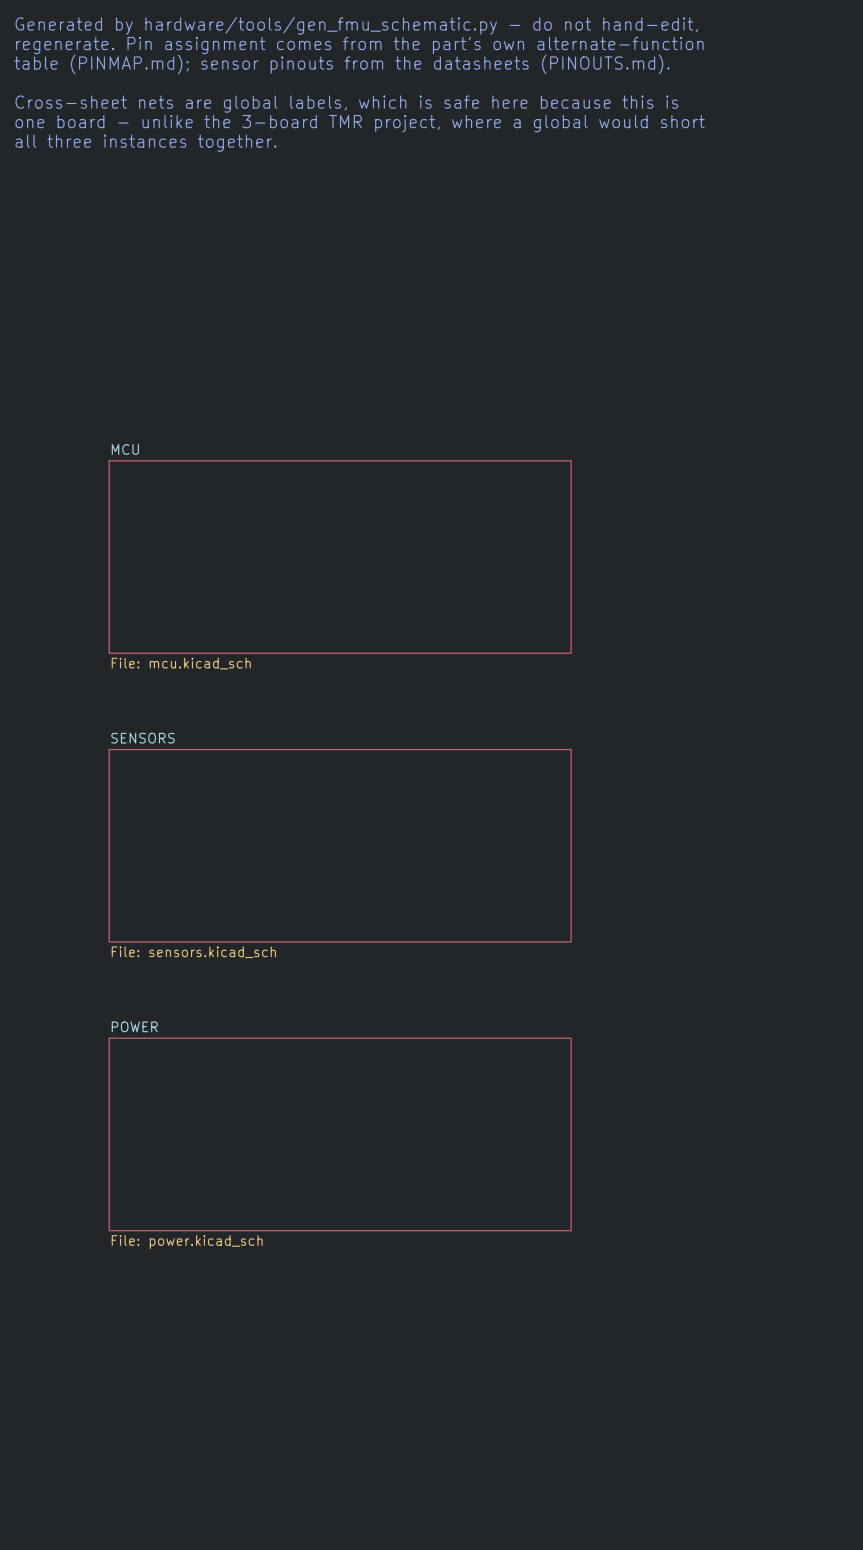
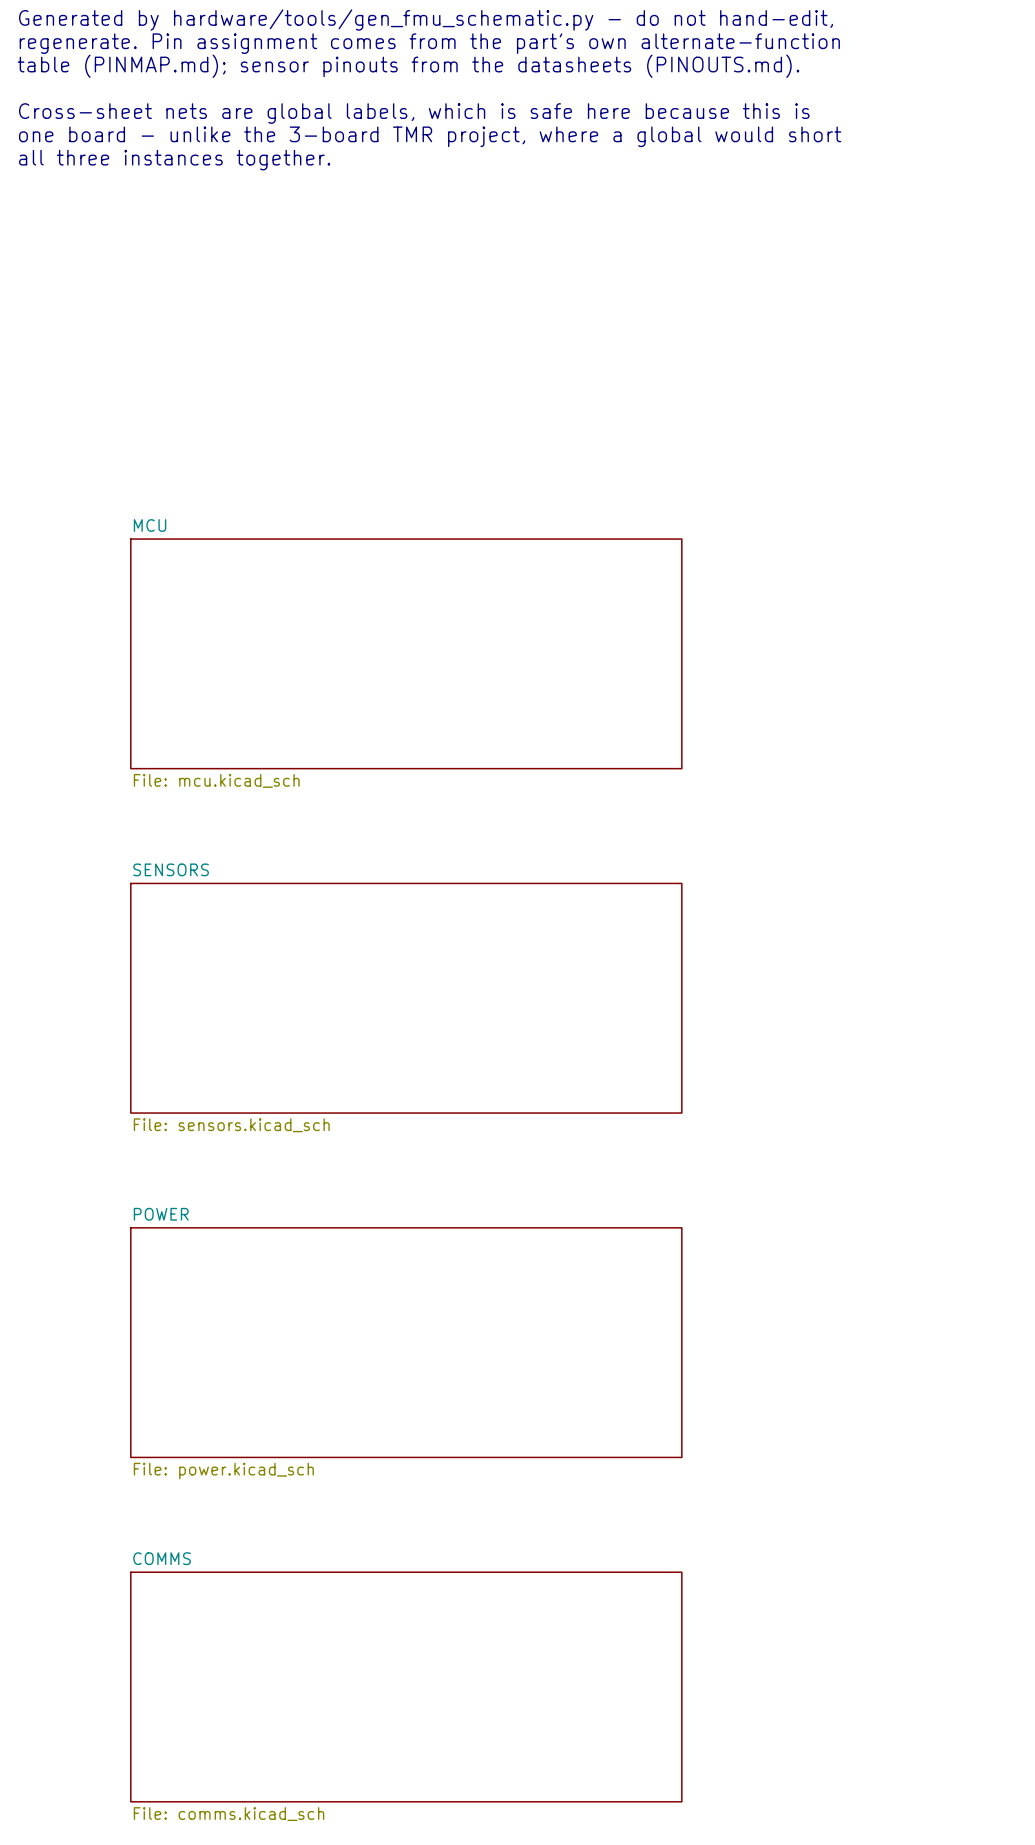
sheet COMMS: none -> File: comms.kicad_sch (406, 1687)

